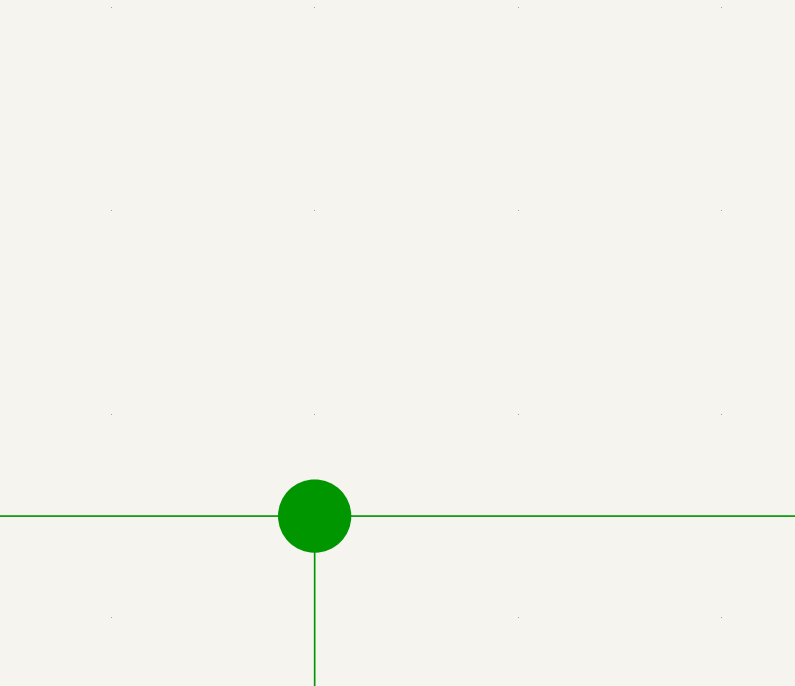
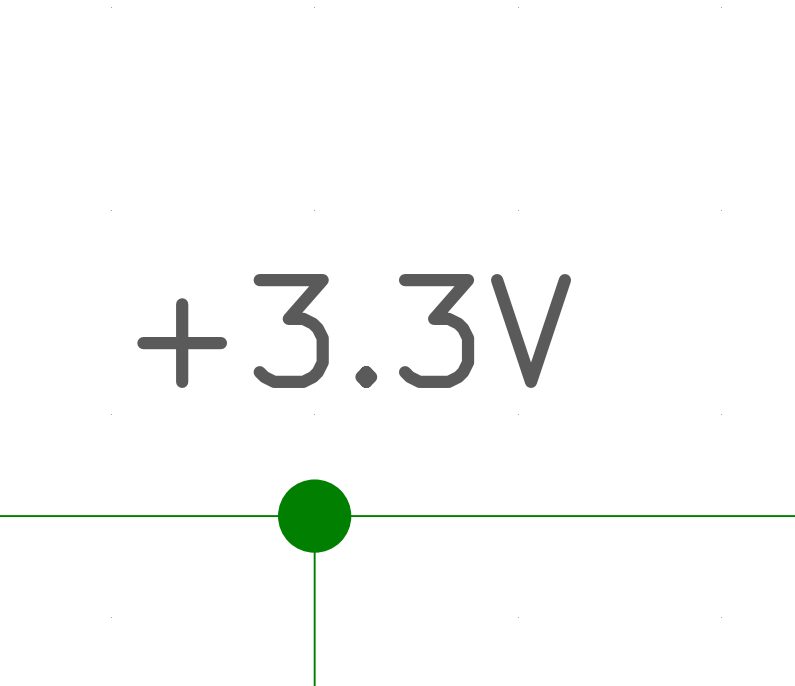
text: none -> +3.3V (354, 330)

